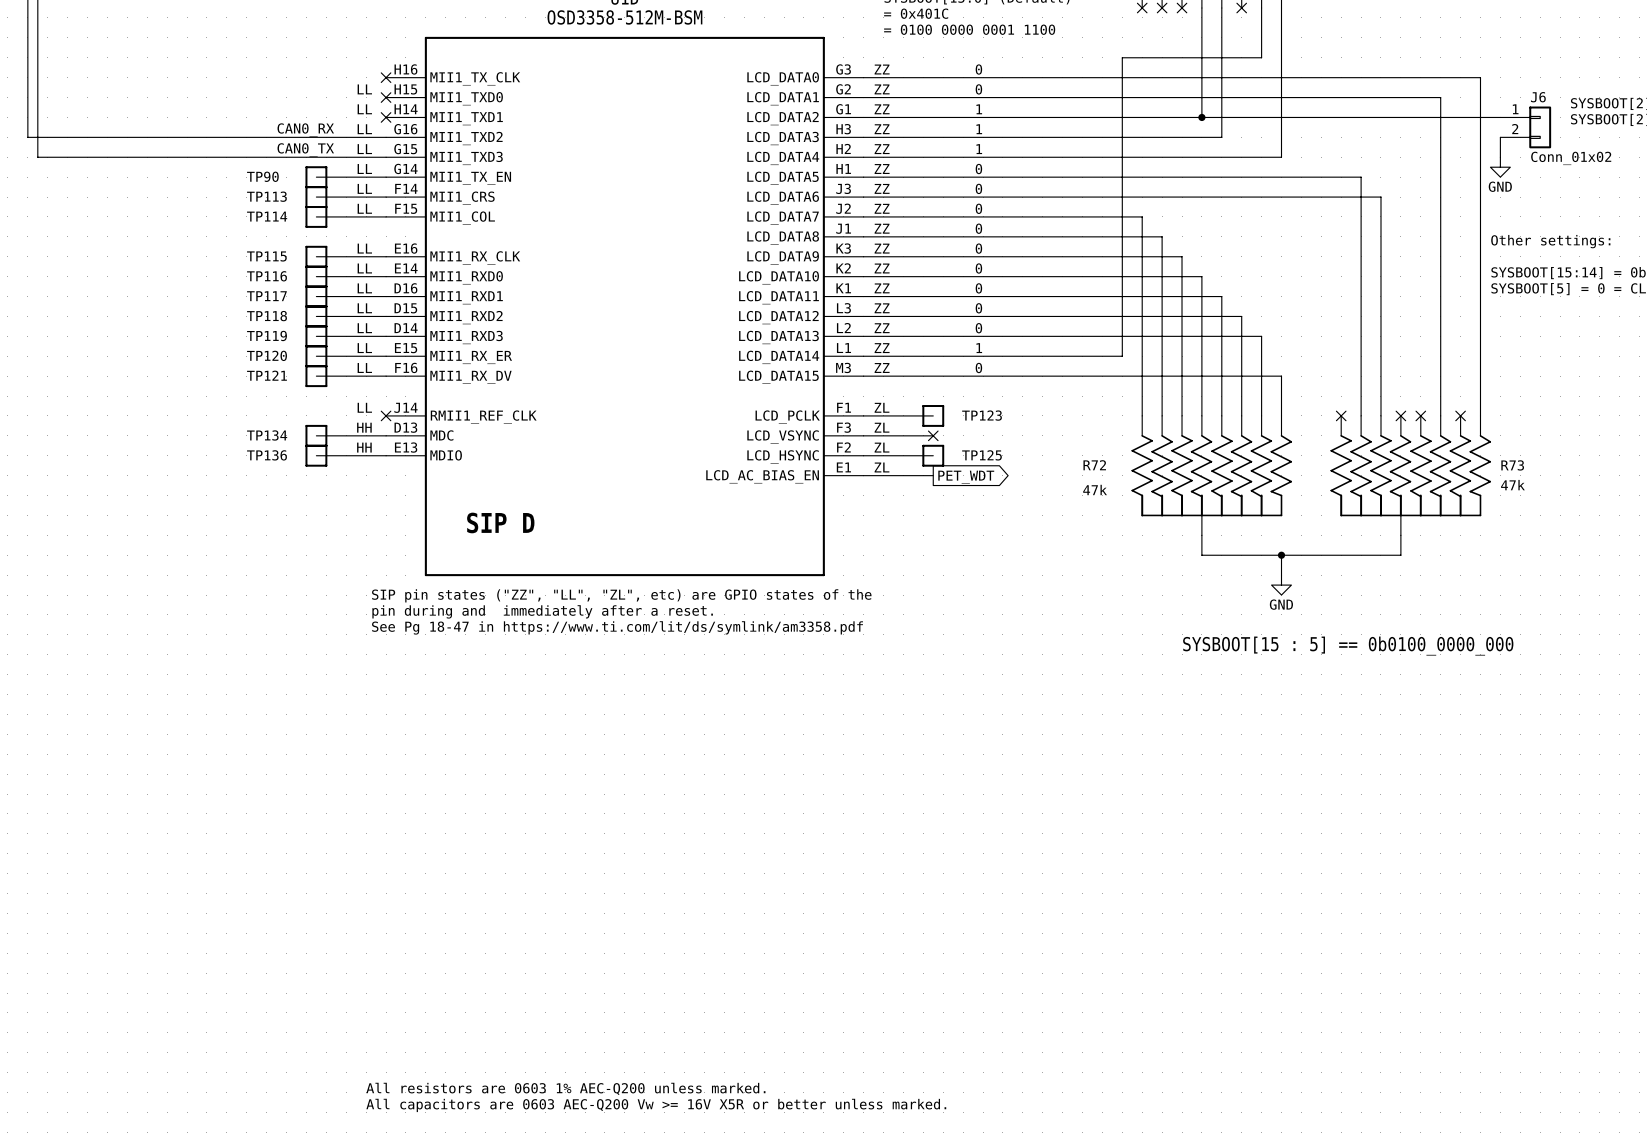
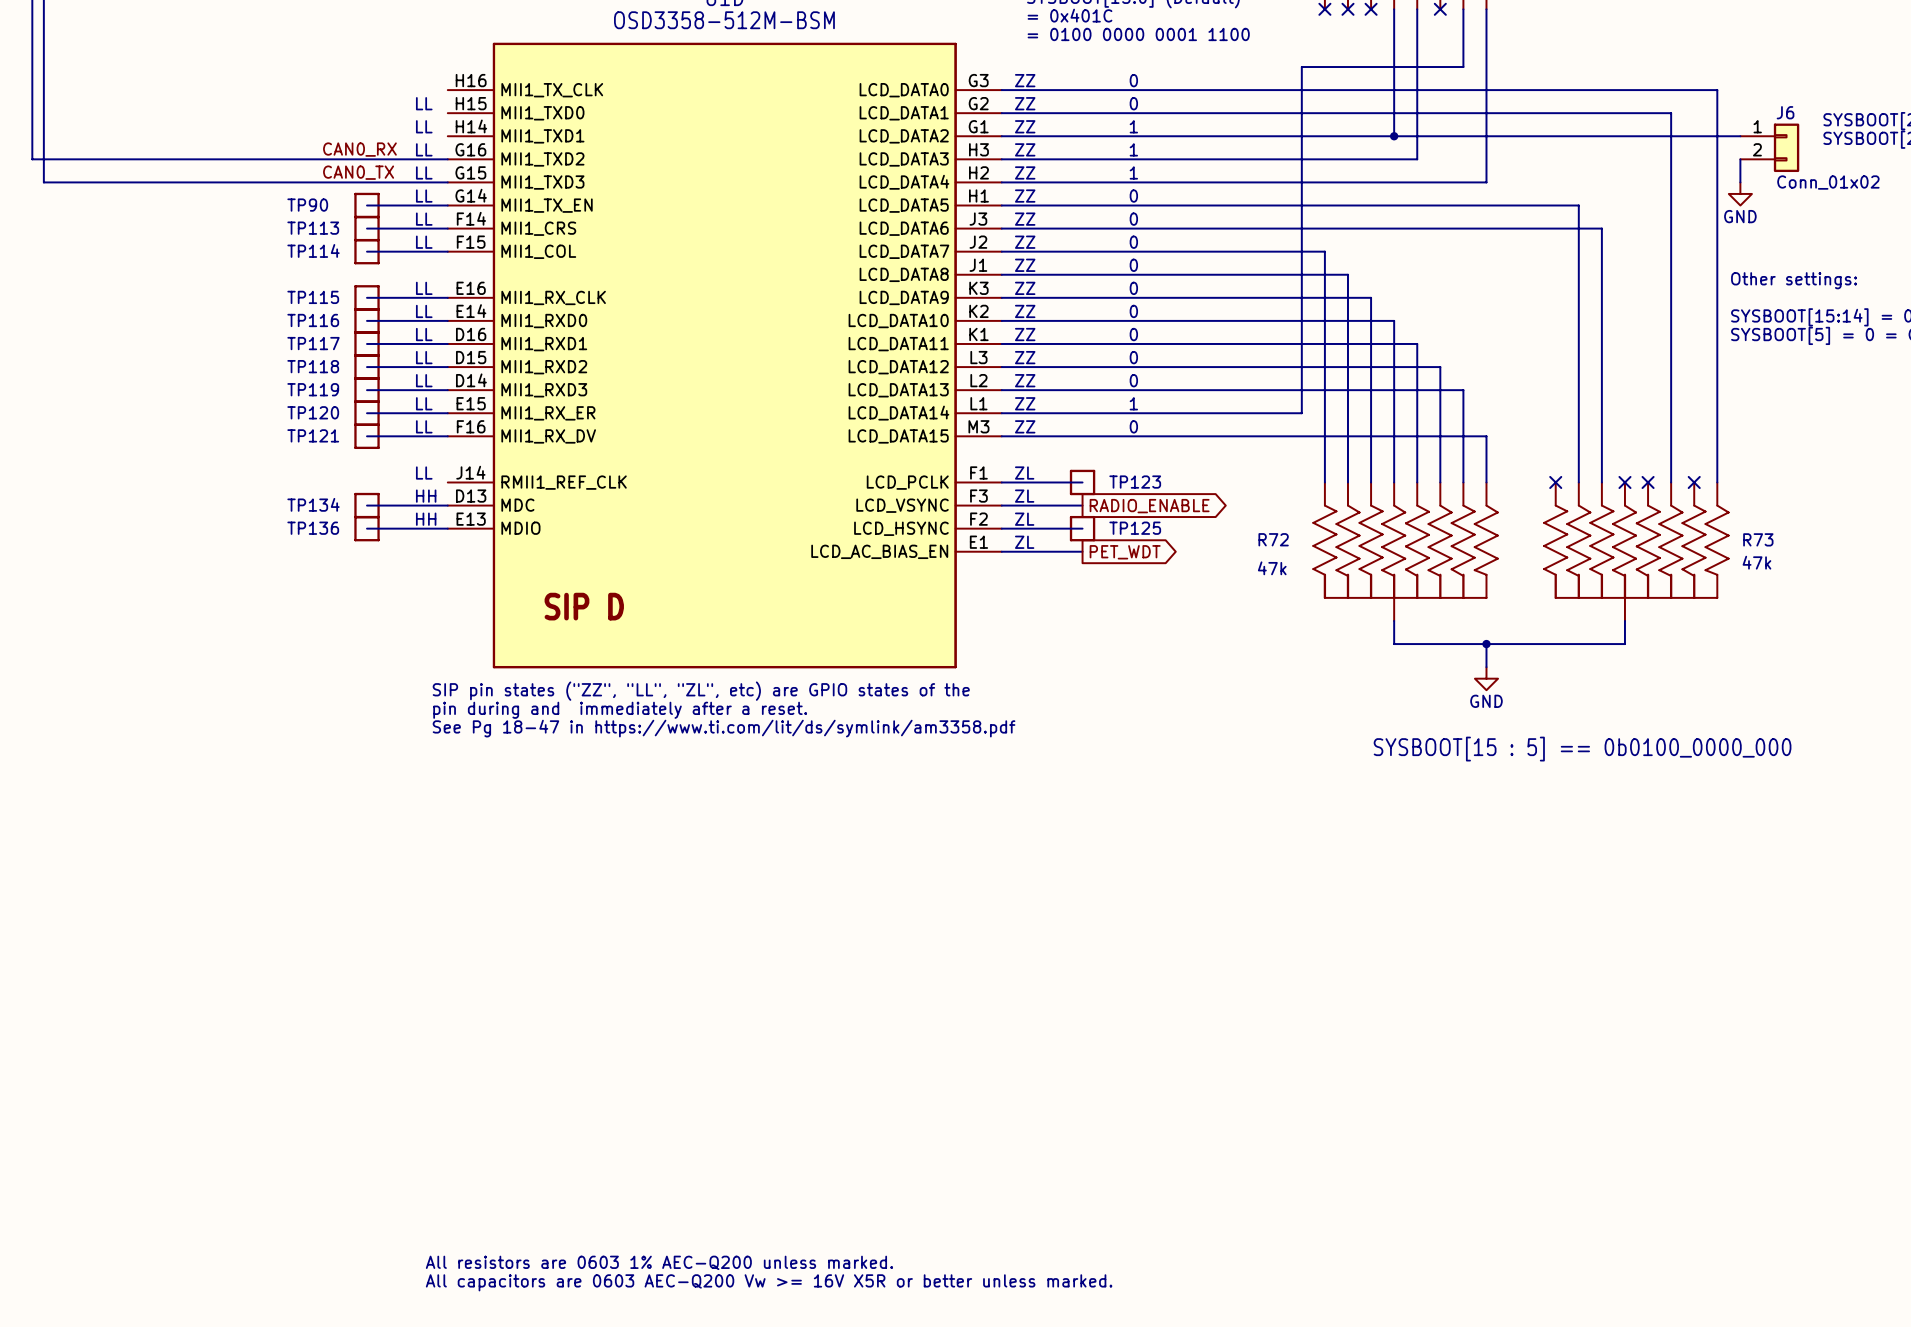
no-connect mark: (386, 77) -> none
no-connect mark: (386, 97) -> none
no-connect mark: (386, 117) -> none
no-connect mark: (386, 415) -> none
no-connect mark: (933, 435) -> none
global label: none -> RADIO_ENABLE (1149, 506)

